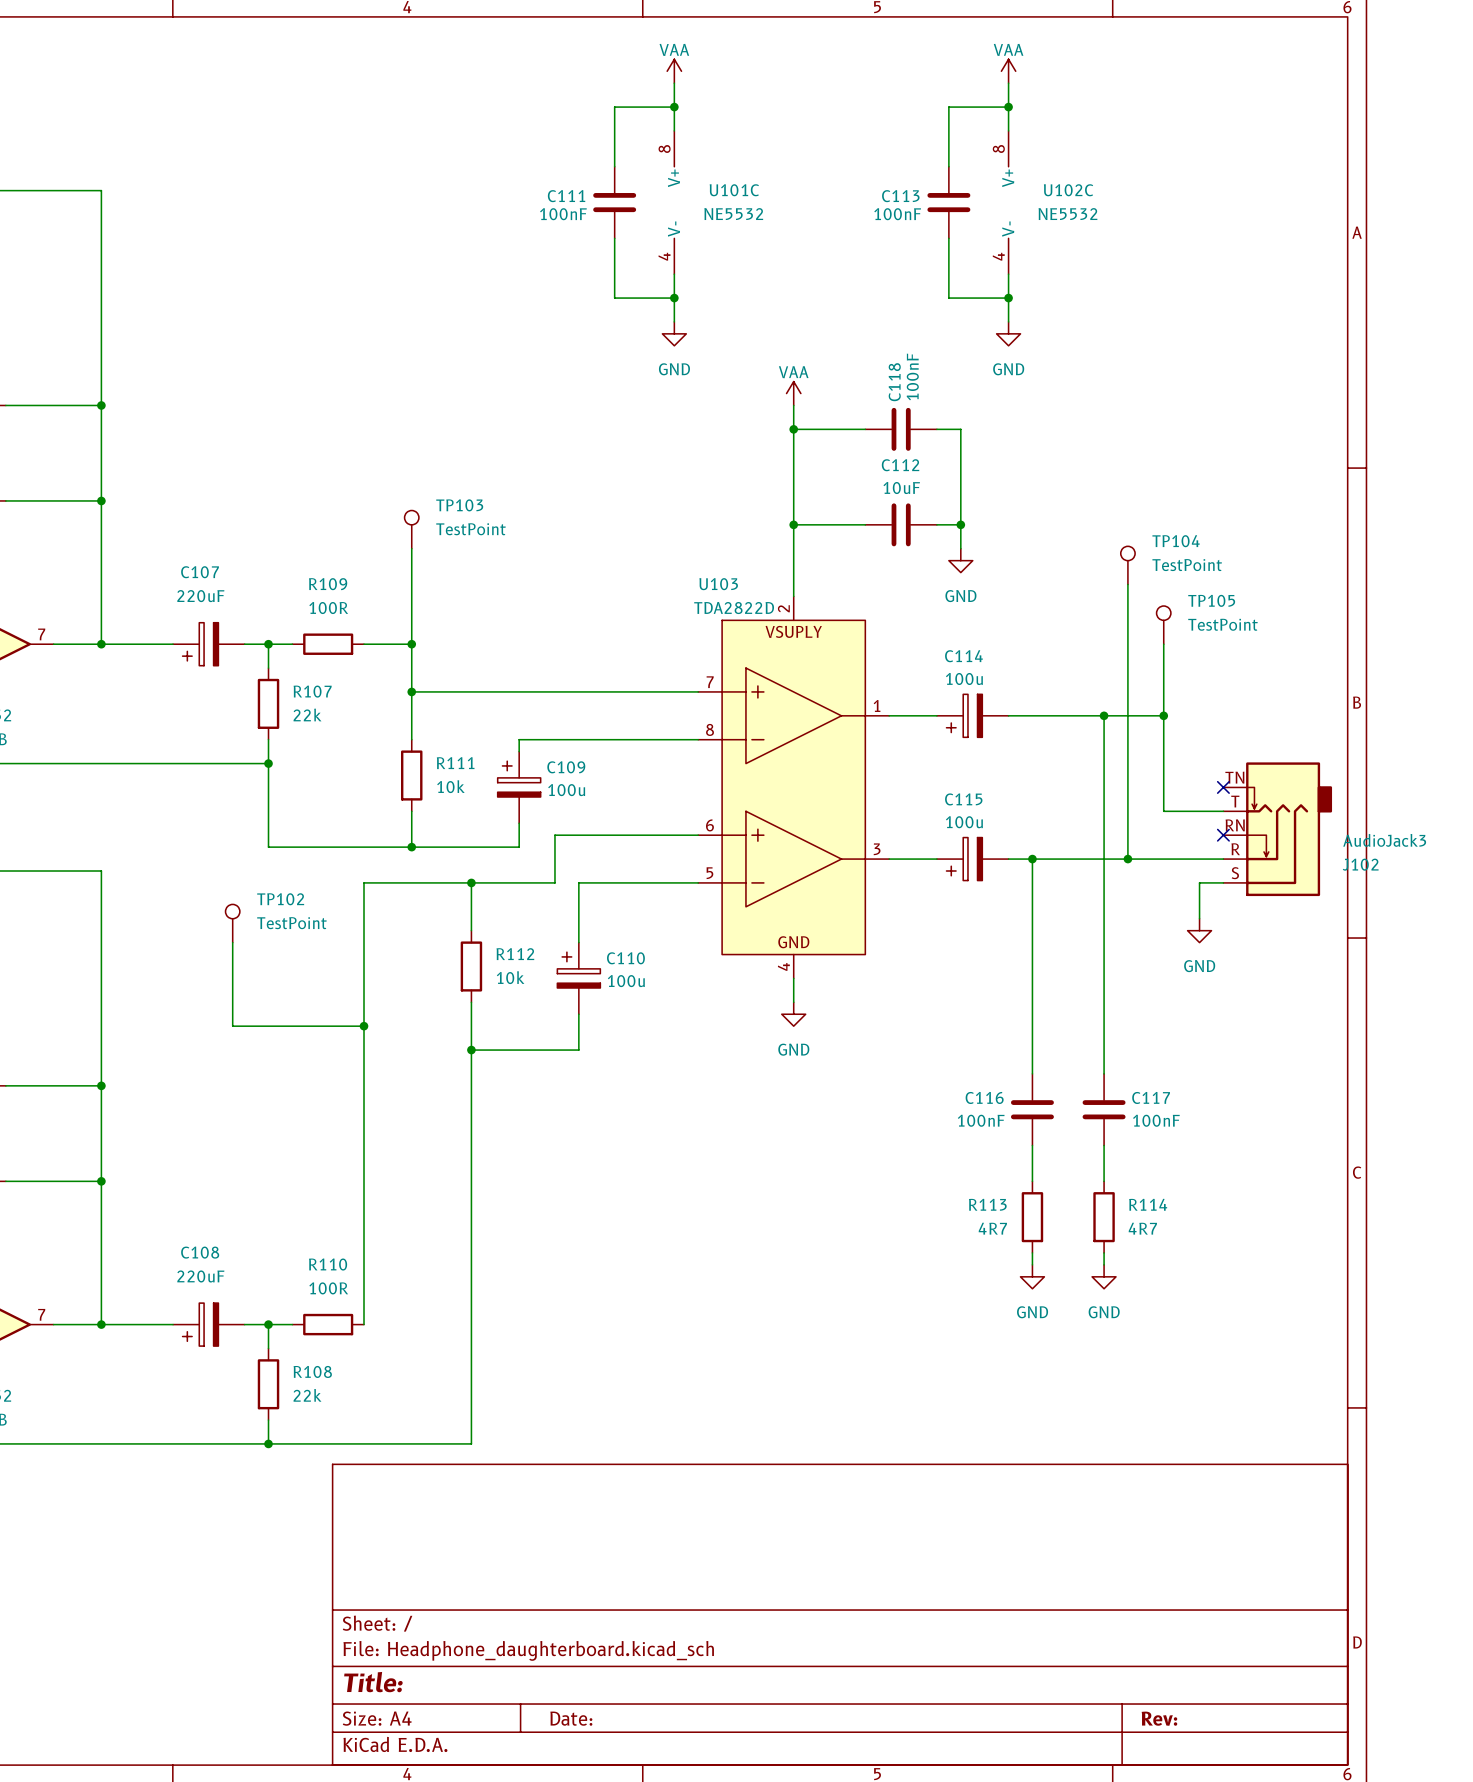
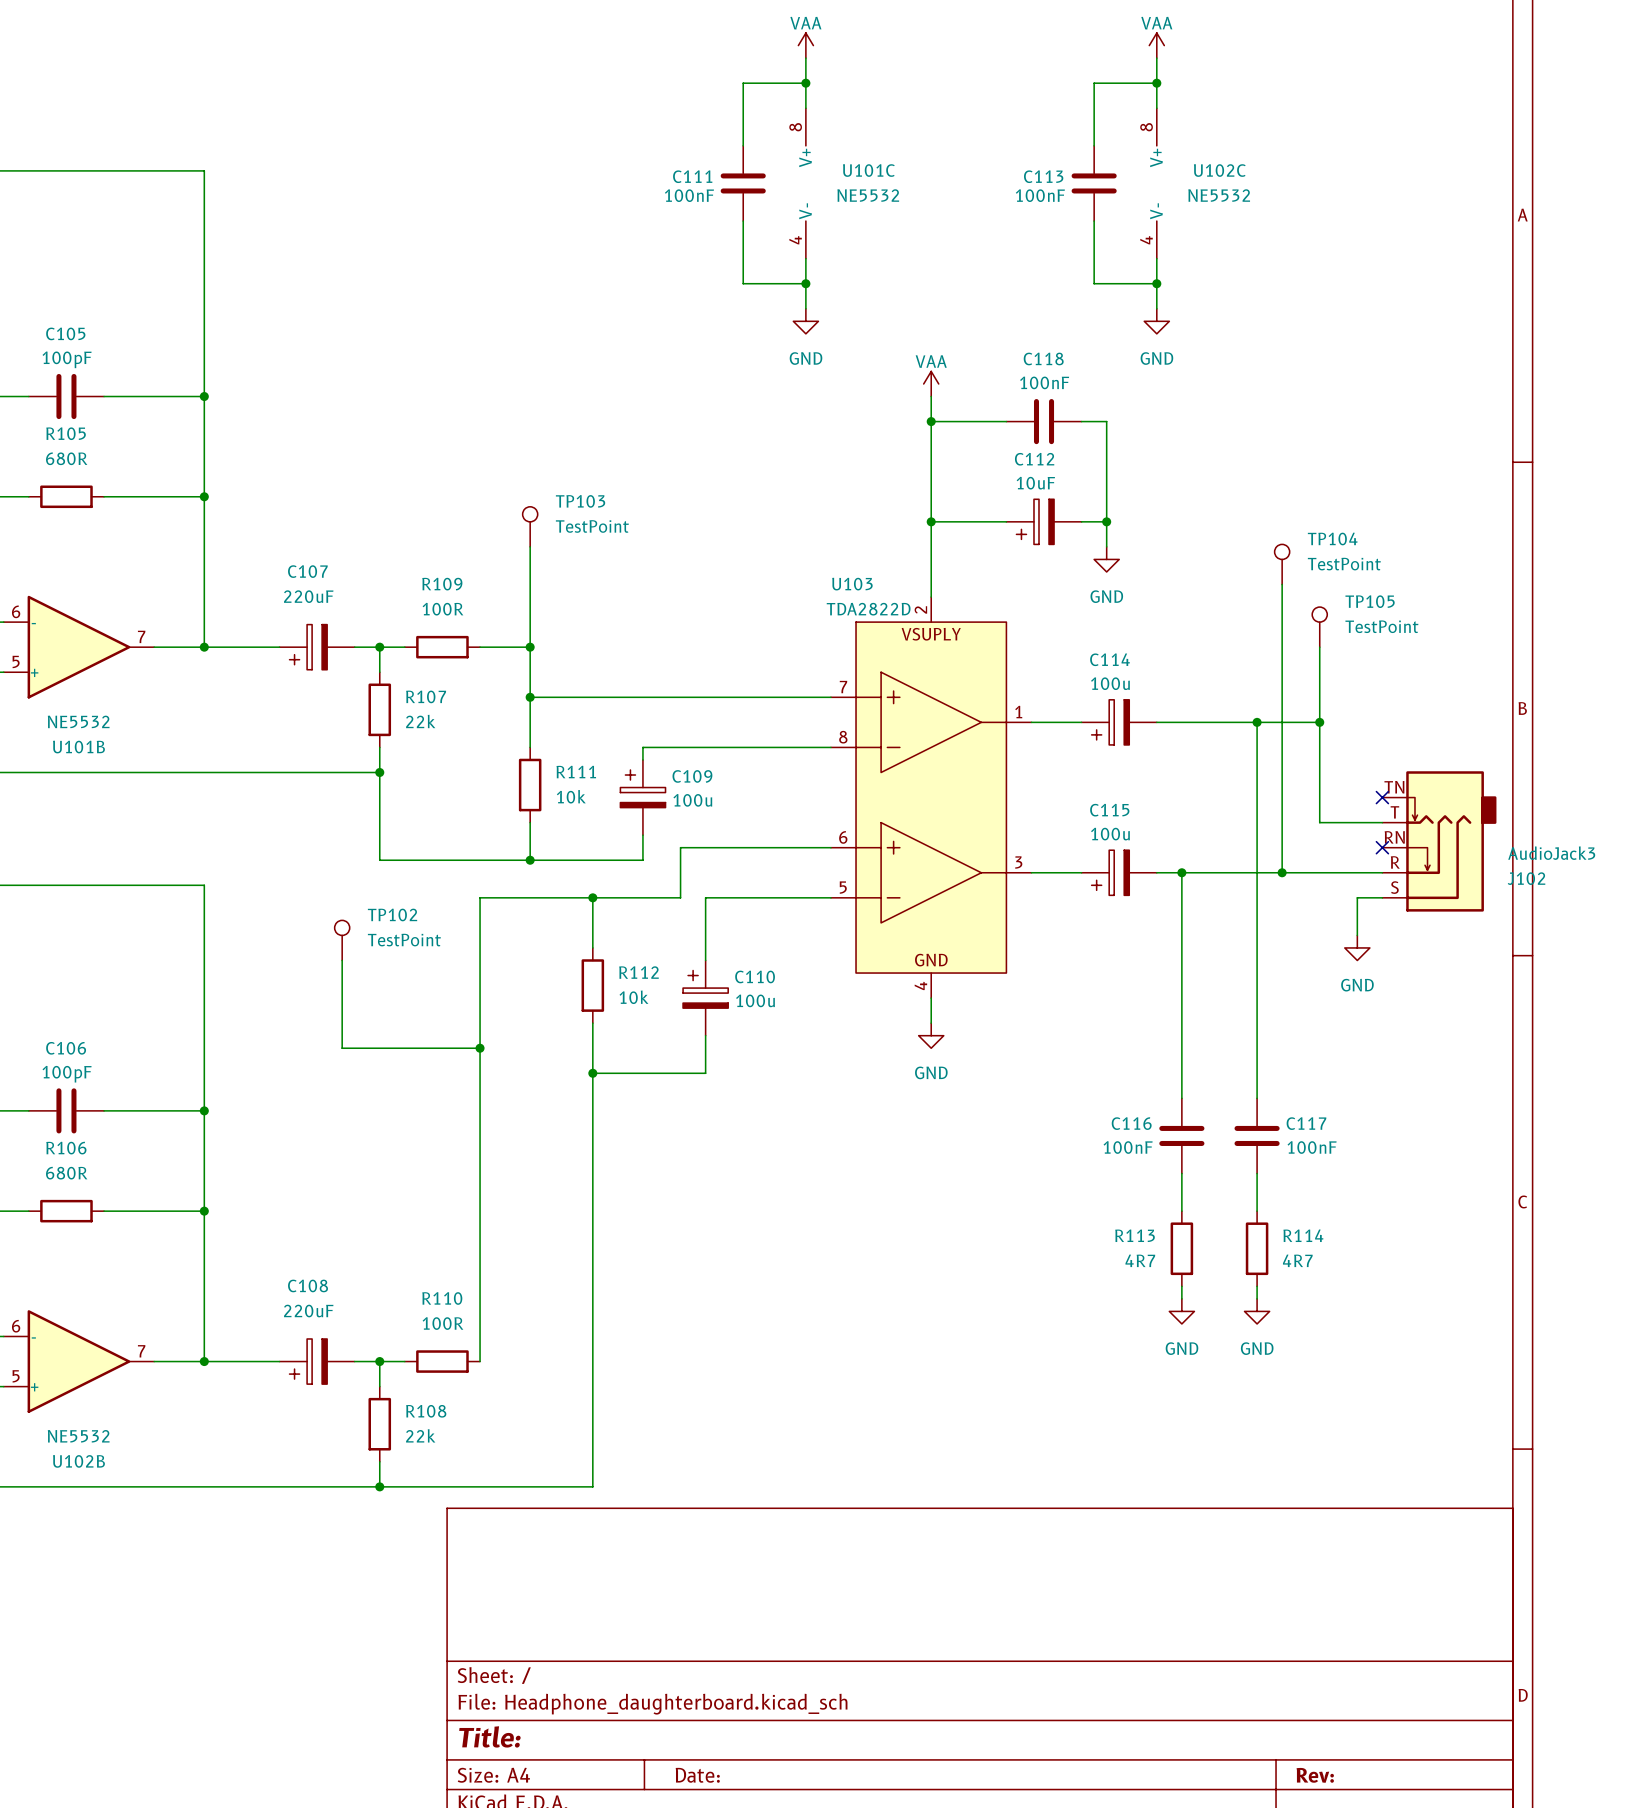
C118 value rotation: 0° (912, 377) -> 90° clockwise (1044, 382)
C118 name rotation: 0° (894, 382) -> 90° clockwise (1043, 358)
C112 symbol: [865, 503, 937, 547] -> [1006, 499, 1082, 545]

